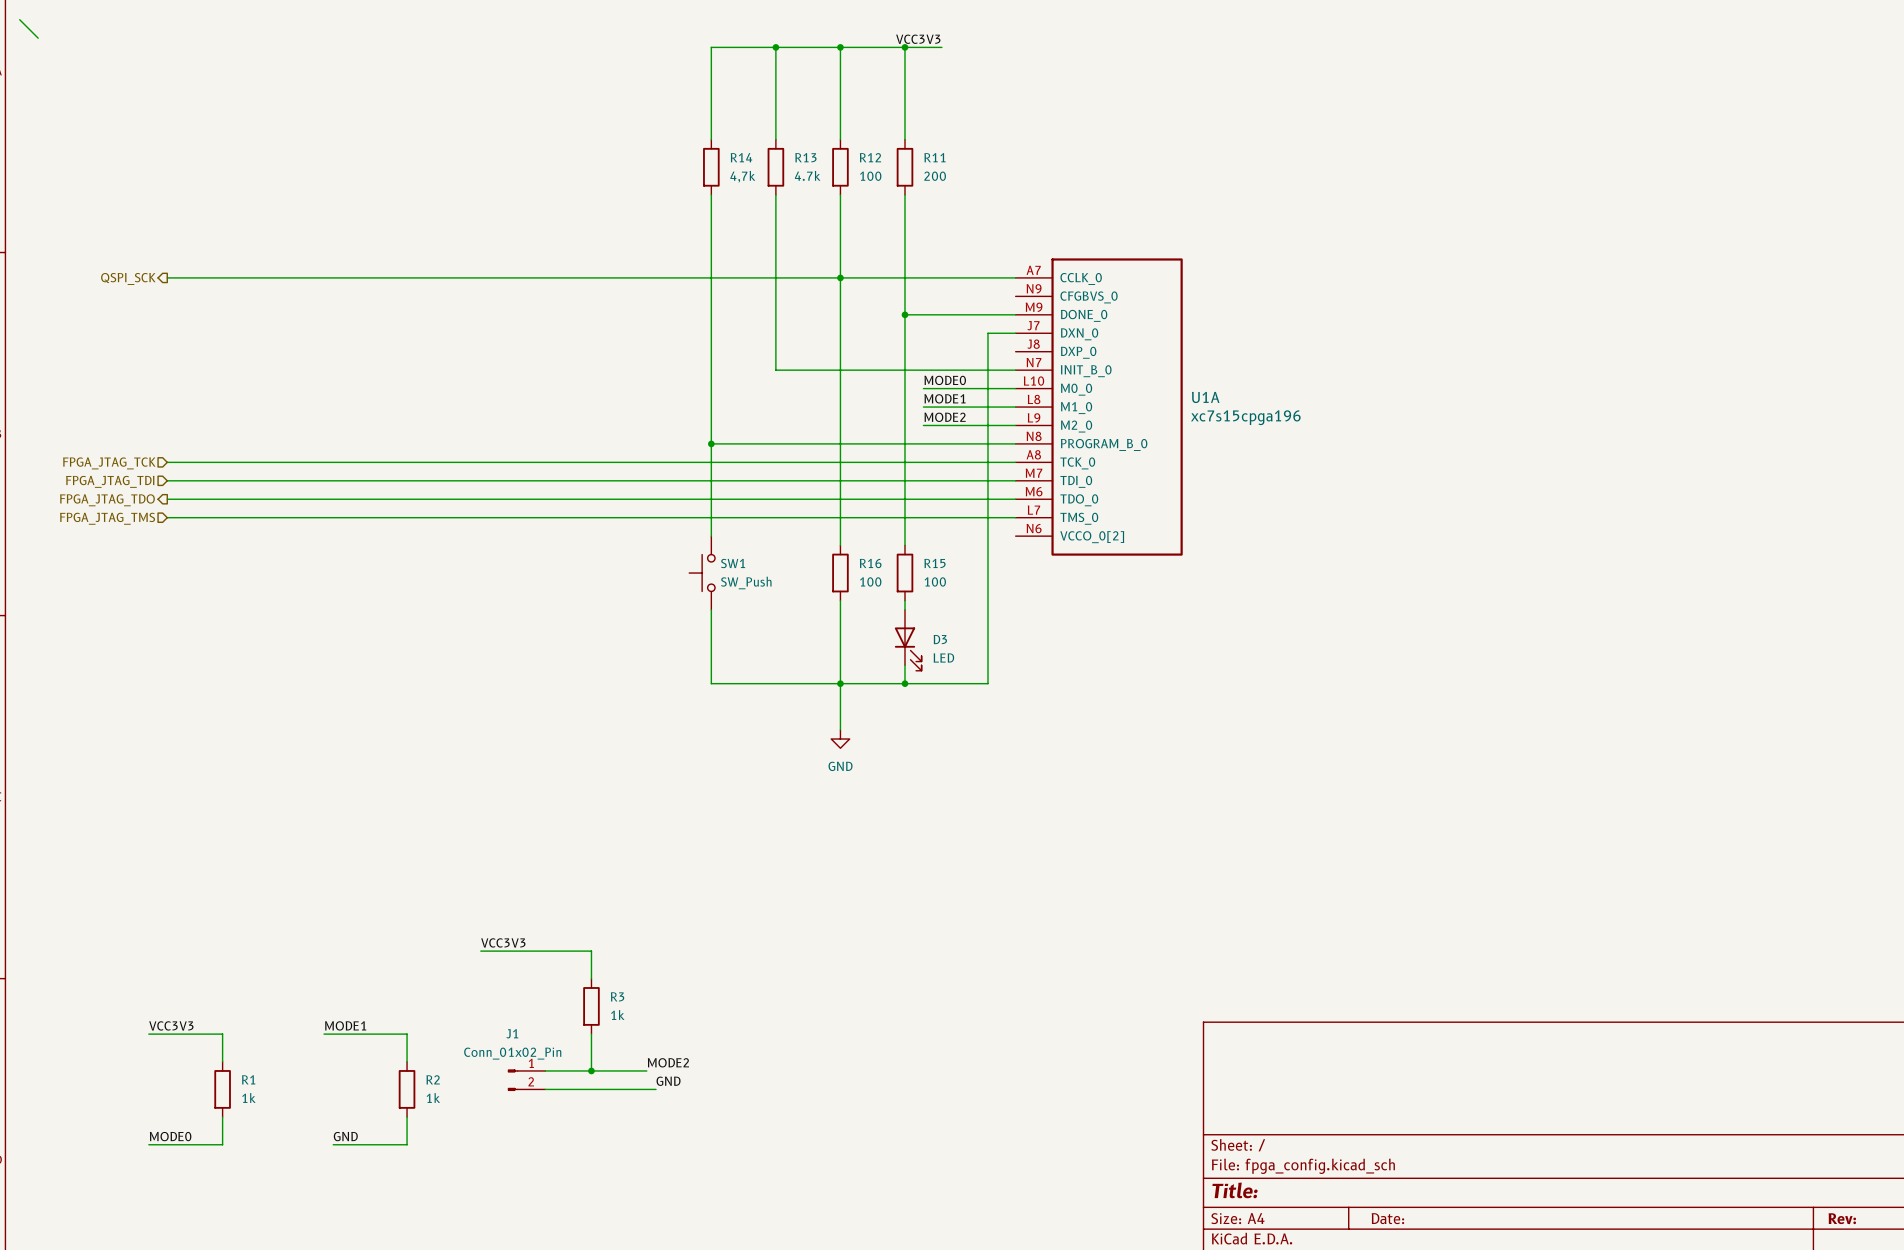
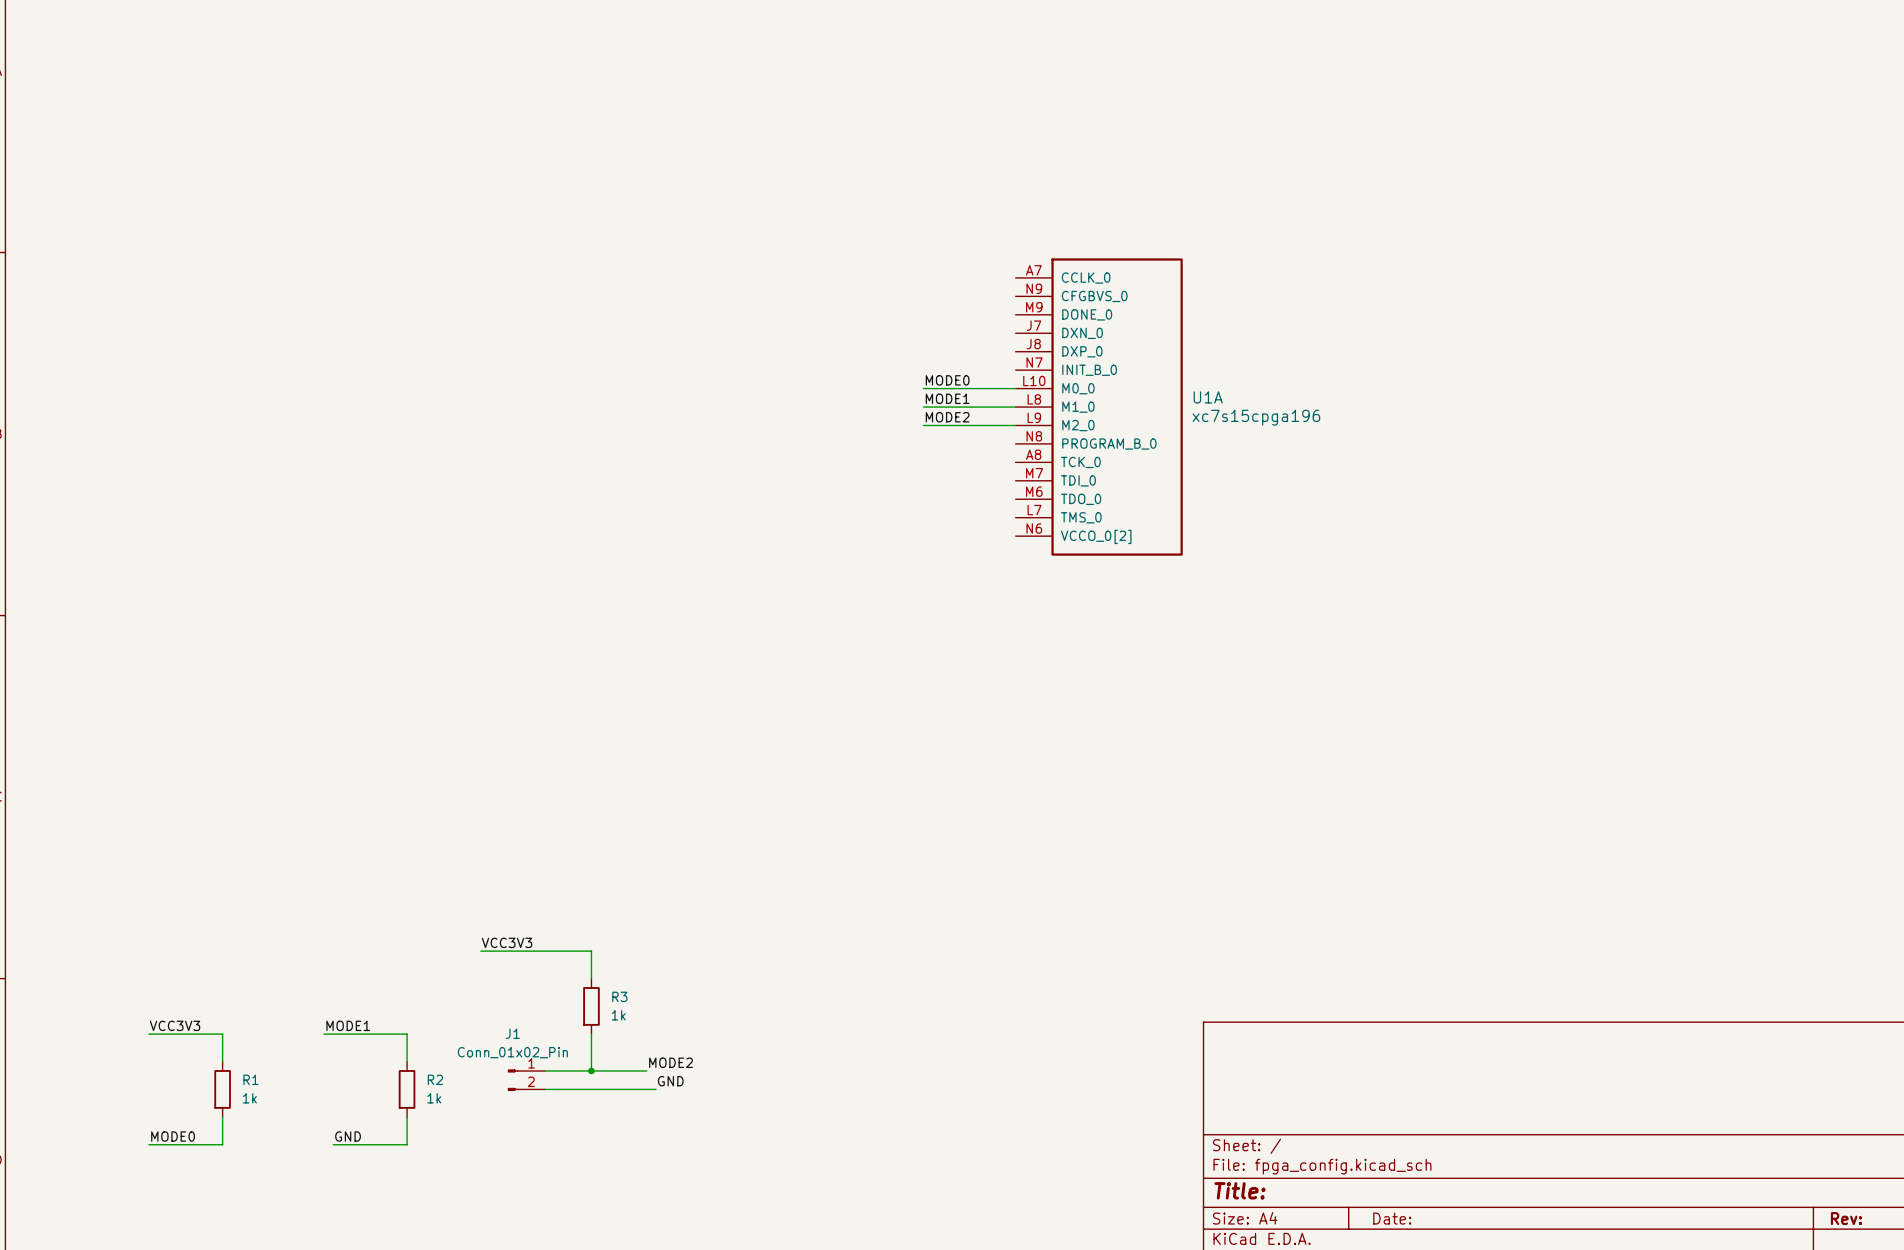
wire: (19, 19) (38, 38) -> none
label: VCC3V3 (918, 39) -> none
wire: (775, 47) (775, 139) -> none
junction: (775, 47) -> none
wire: (840, 47) (840, 139) -> none
junction: (840, 47) -> none
wire: (904, 47) (904, 139) -> none
junction: (904, 47) -> none
wire: (941, 47) (711, 47) (711, 139) -> none
R14: 4,7k (711, 167) -> none
R13: 4.7k (775, 167) -> none
R12: 100 (840, 167) -> none
R11: 200 (904, 167) -> none
wire: (711, 194) (711, 536) -> none
wire: (775, 194) (775, 370) (1015, 370) -> none
wire: (840, 194) (840, 545) -> none
wire: (904, 194) (904, 545) -> none
wire: (167, 277) (1015, 277) -> none
junction: (840, 277) -> none
hierarchical label: QSPI_SCK (128, 278) -> none
wire: (904, 314) (1015, 314) -> none
junction: (904, 314) -> none
wire: (1015, 333) (987, 333) (987, 683) (711, 683) (711, 609) -> none
wire: (711, 443) (1015, 443) -> none
junction: (711, 443) -> none
wire: (167, 462) (1015, 462) -> none
hierarchical label: FPGA_JTAG_TCK (109, 463) -> none
wire: (167, 480) (1015, 480) -> none
hierarchical label: FPGA_JTAG_TDI (110, 481) -> none
wire: (167, 499) (1015, 499) -> none
hierarchical label: FPGA_JTAG_TDO (107, 500) -> none
wire: (167, 517) (1015, 517) -> none
hierarchical label: FPGA_JTAG_TMS (107, 518) -> none
SW1: SW_Push (702, 573) -> none
R16: 100 (840, 573) -> none
R15: 100 (904, 573) -> none
wire: (840, 600) (840, 729) -> none
wire: (904, 600) (904, 609) -> none
D3: LED (908, 640) -> none
wire: (904, 665) (904, 683) -> none
junction: (840, 683) -> none
junction: (904, 683) -> none
power symbol: GND (840, 739) -> none

